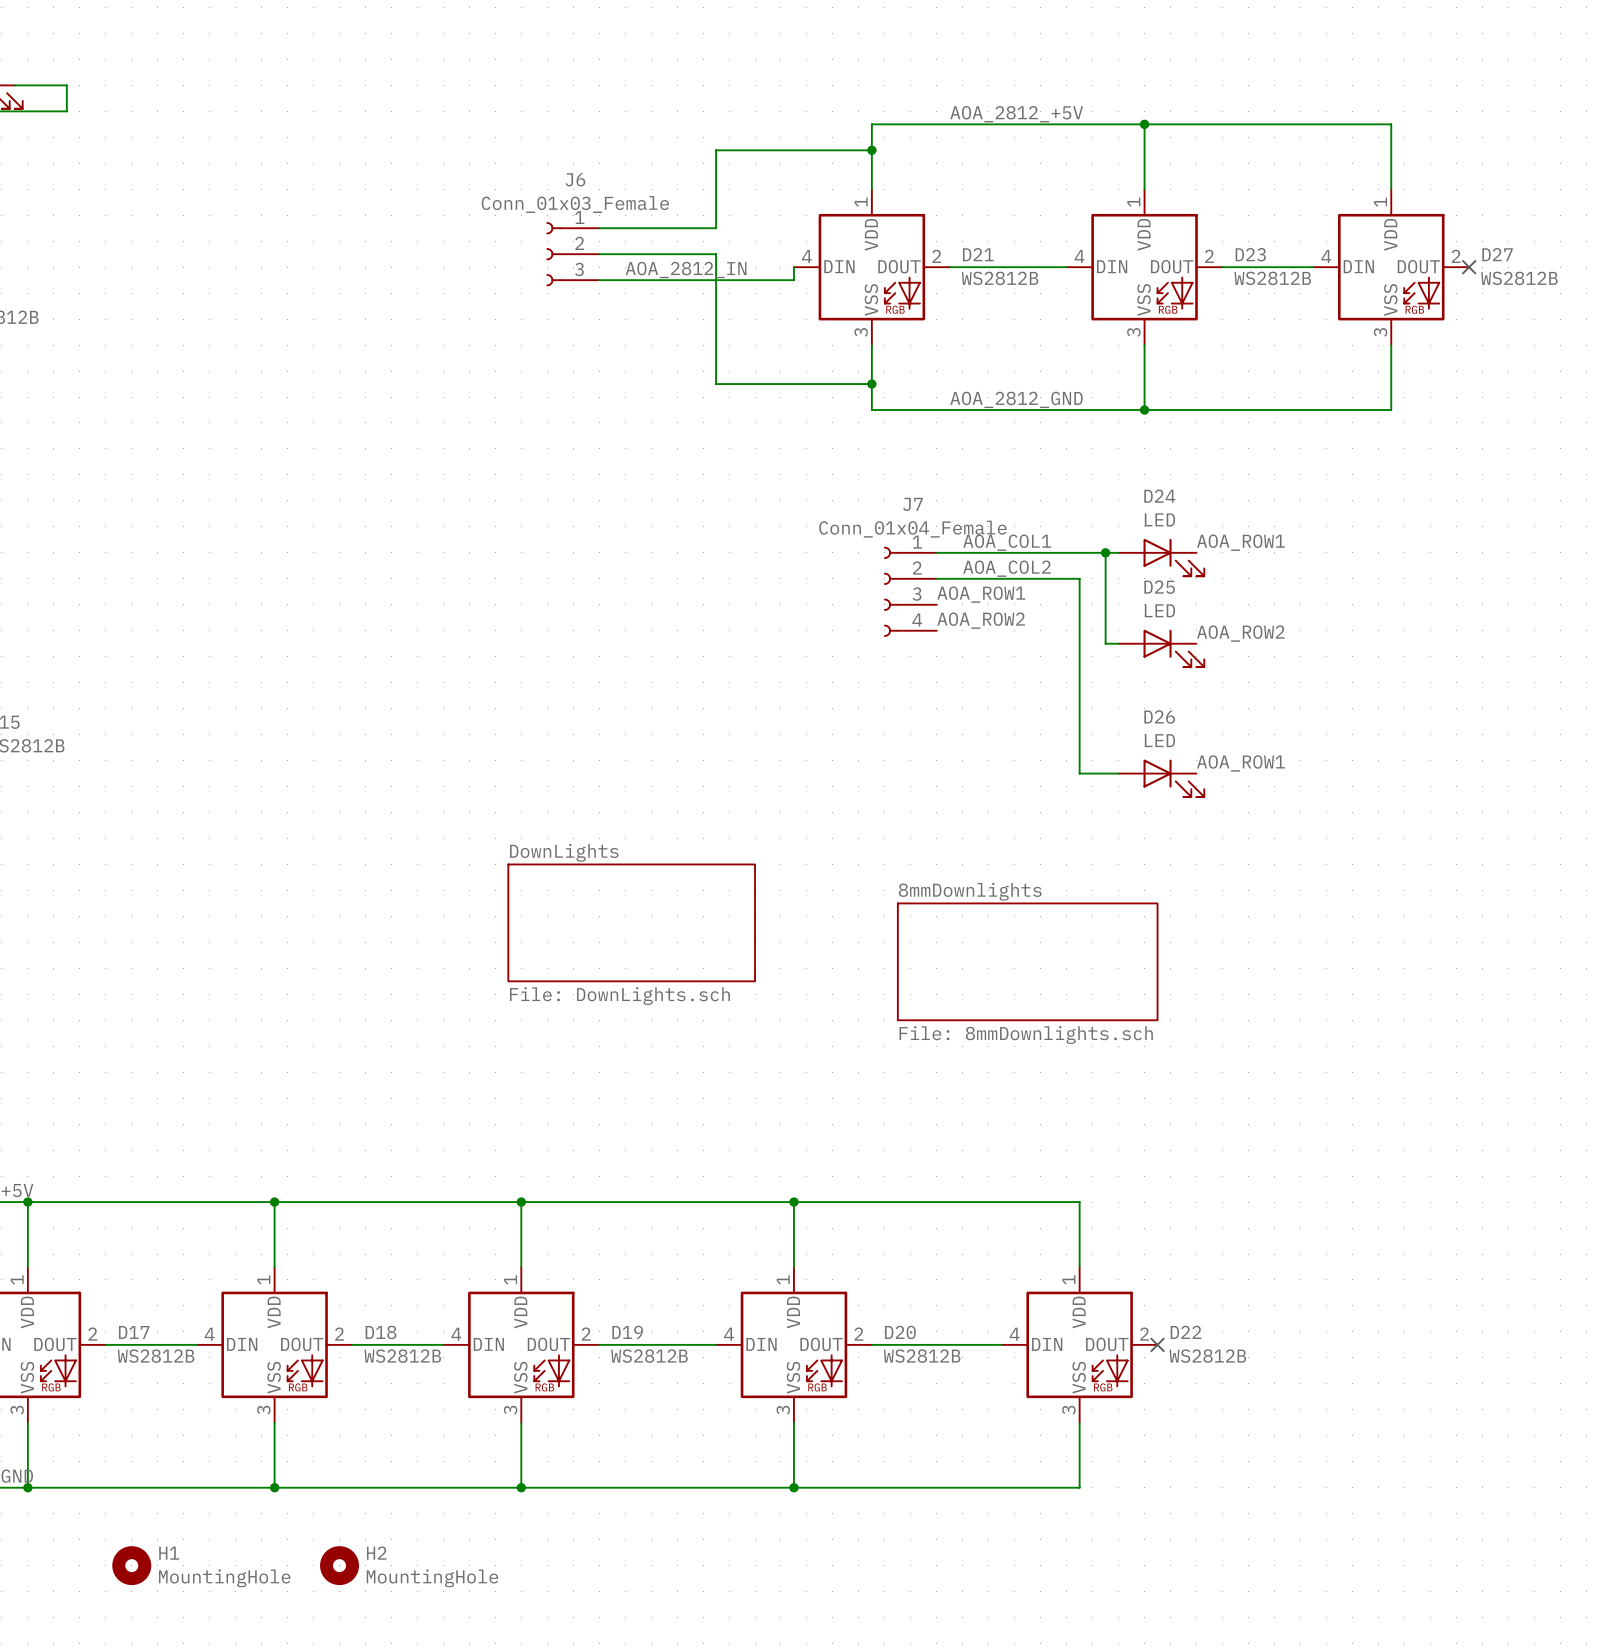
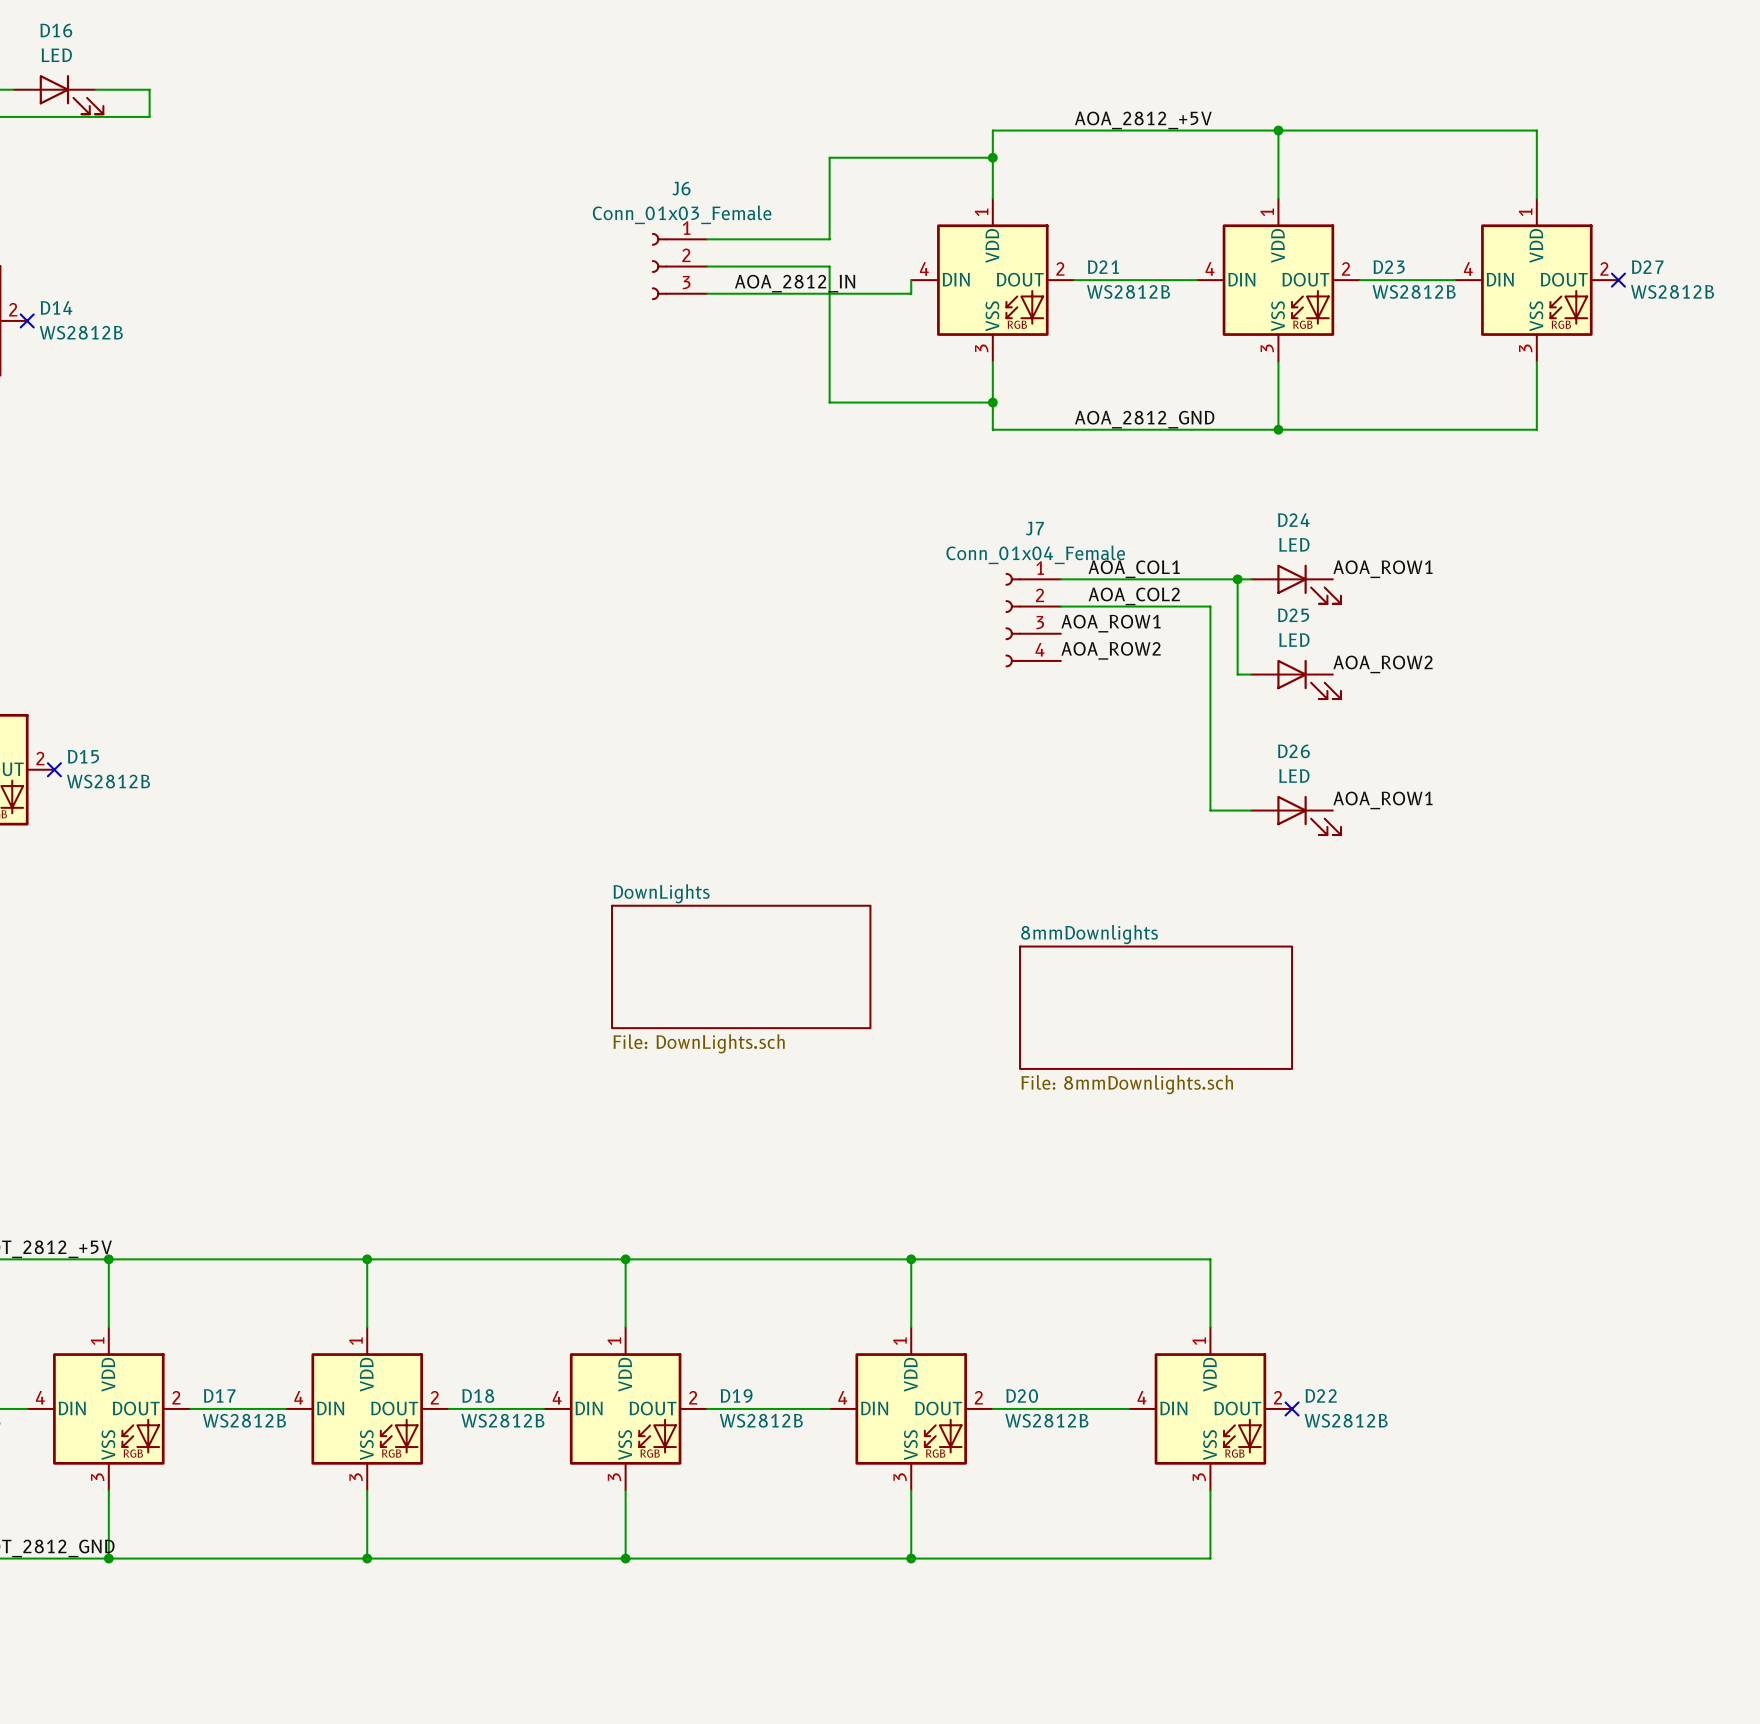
H1: MountingHole (131, 1565) -> none
H2: MountingHole (339, 1565) -> none

